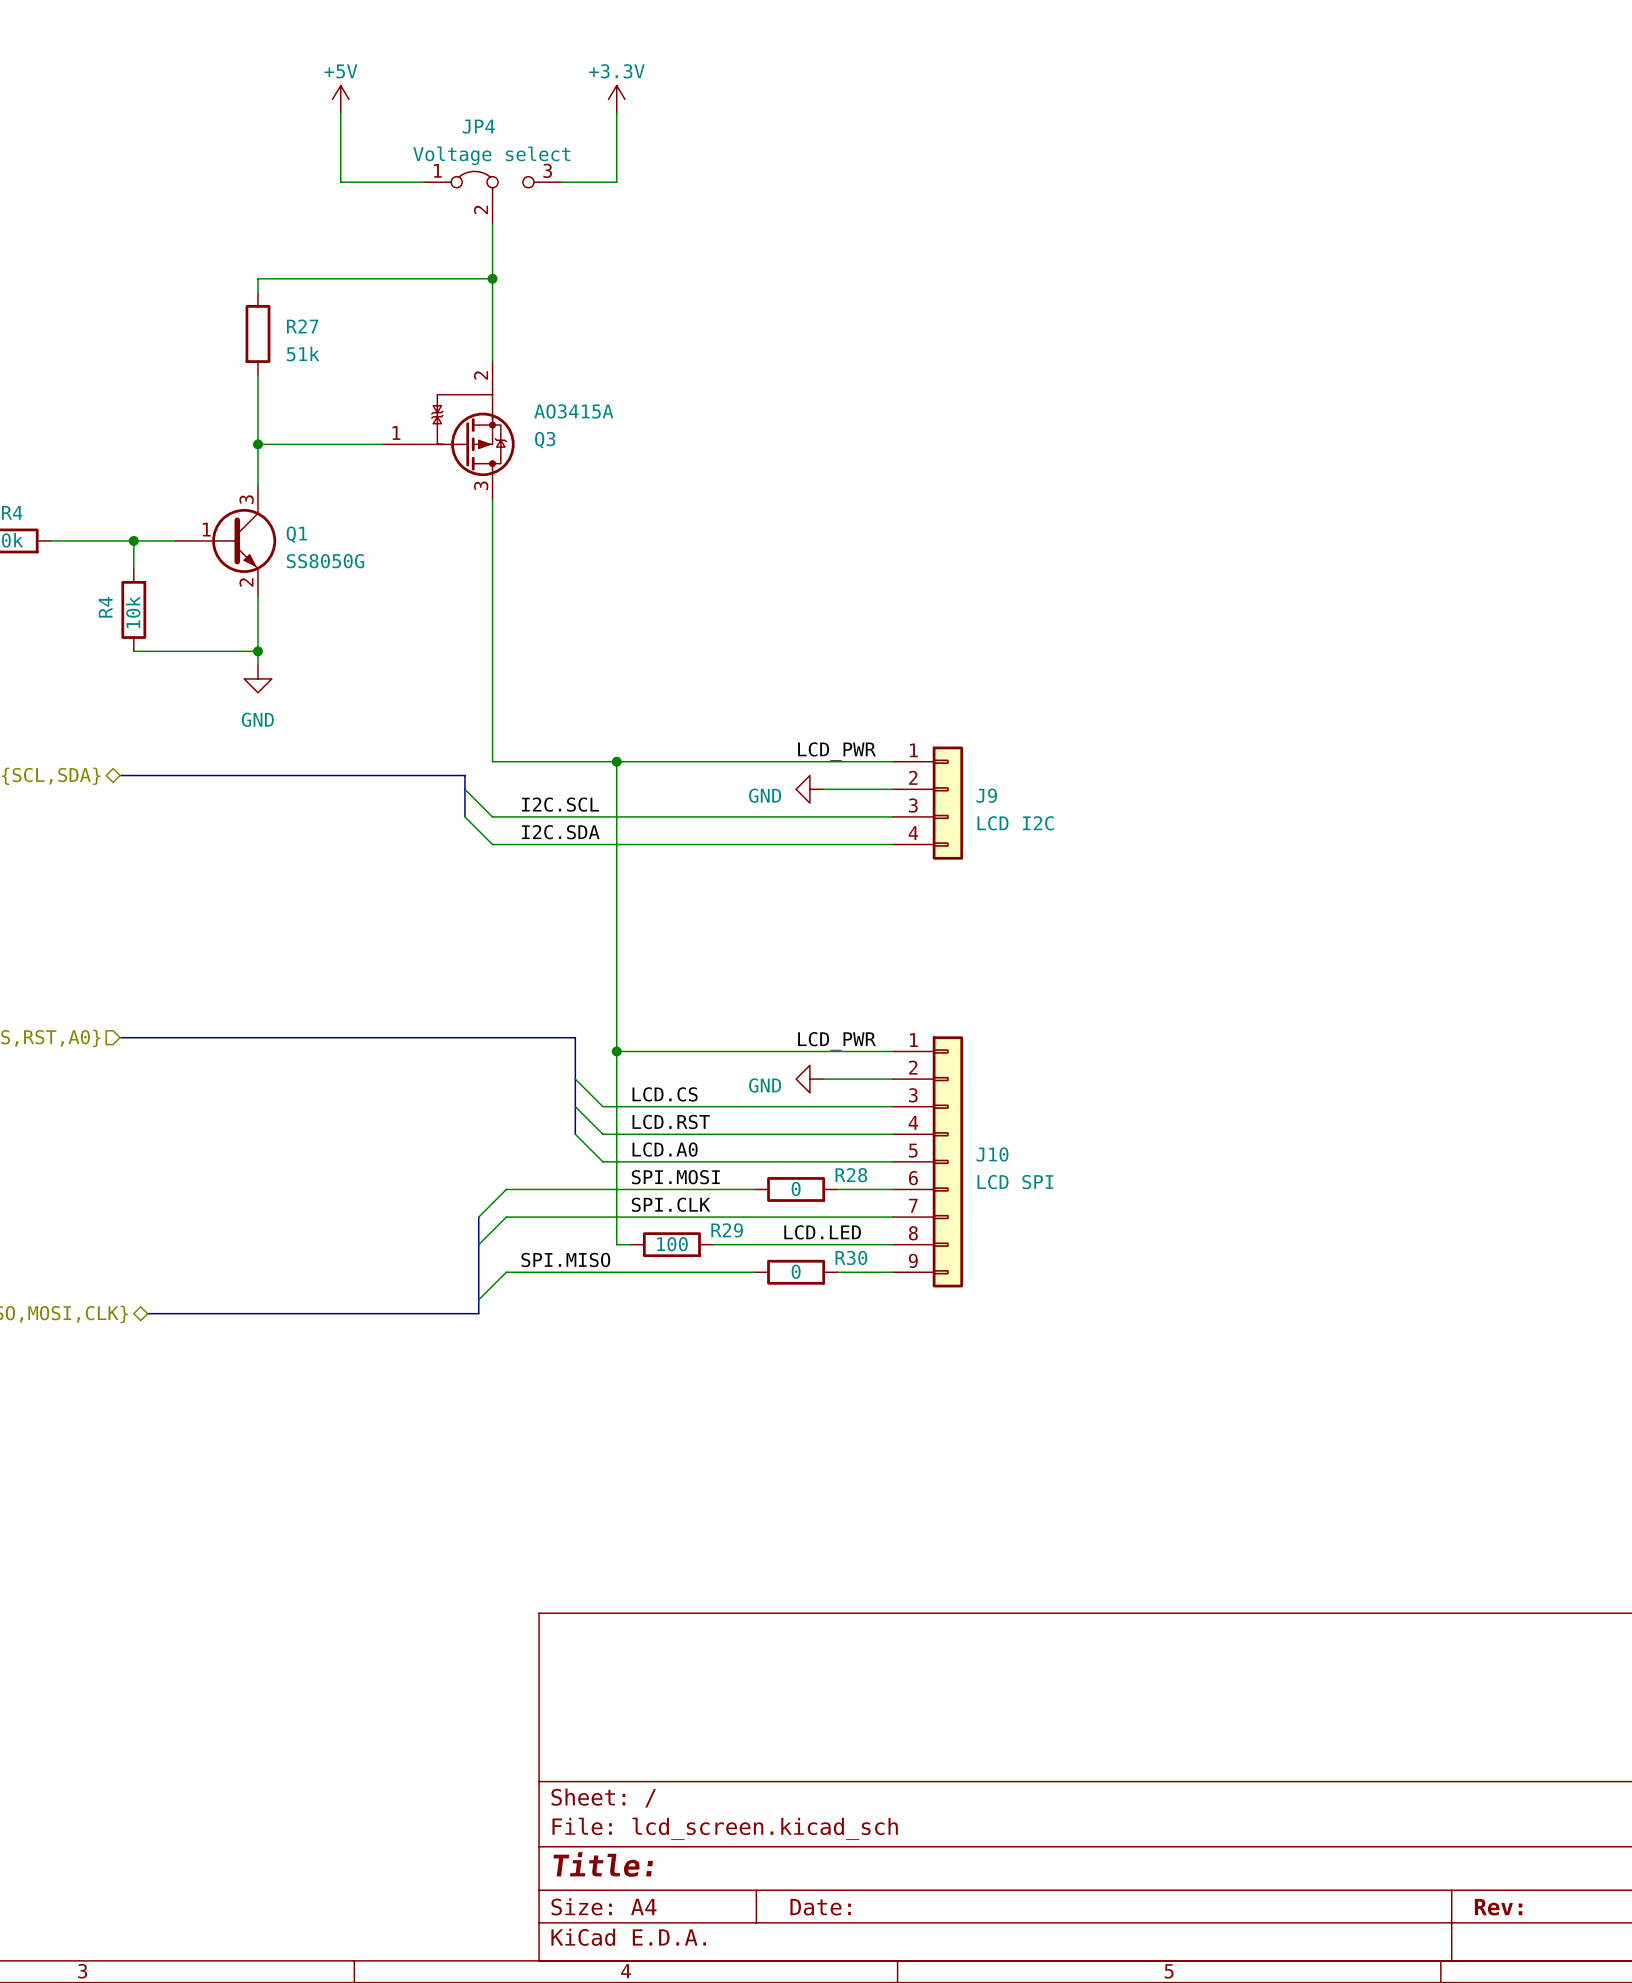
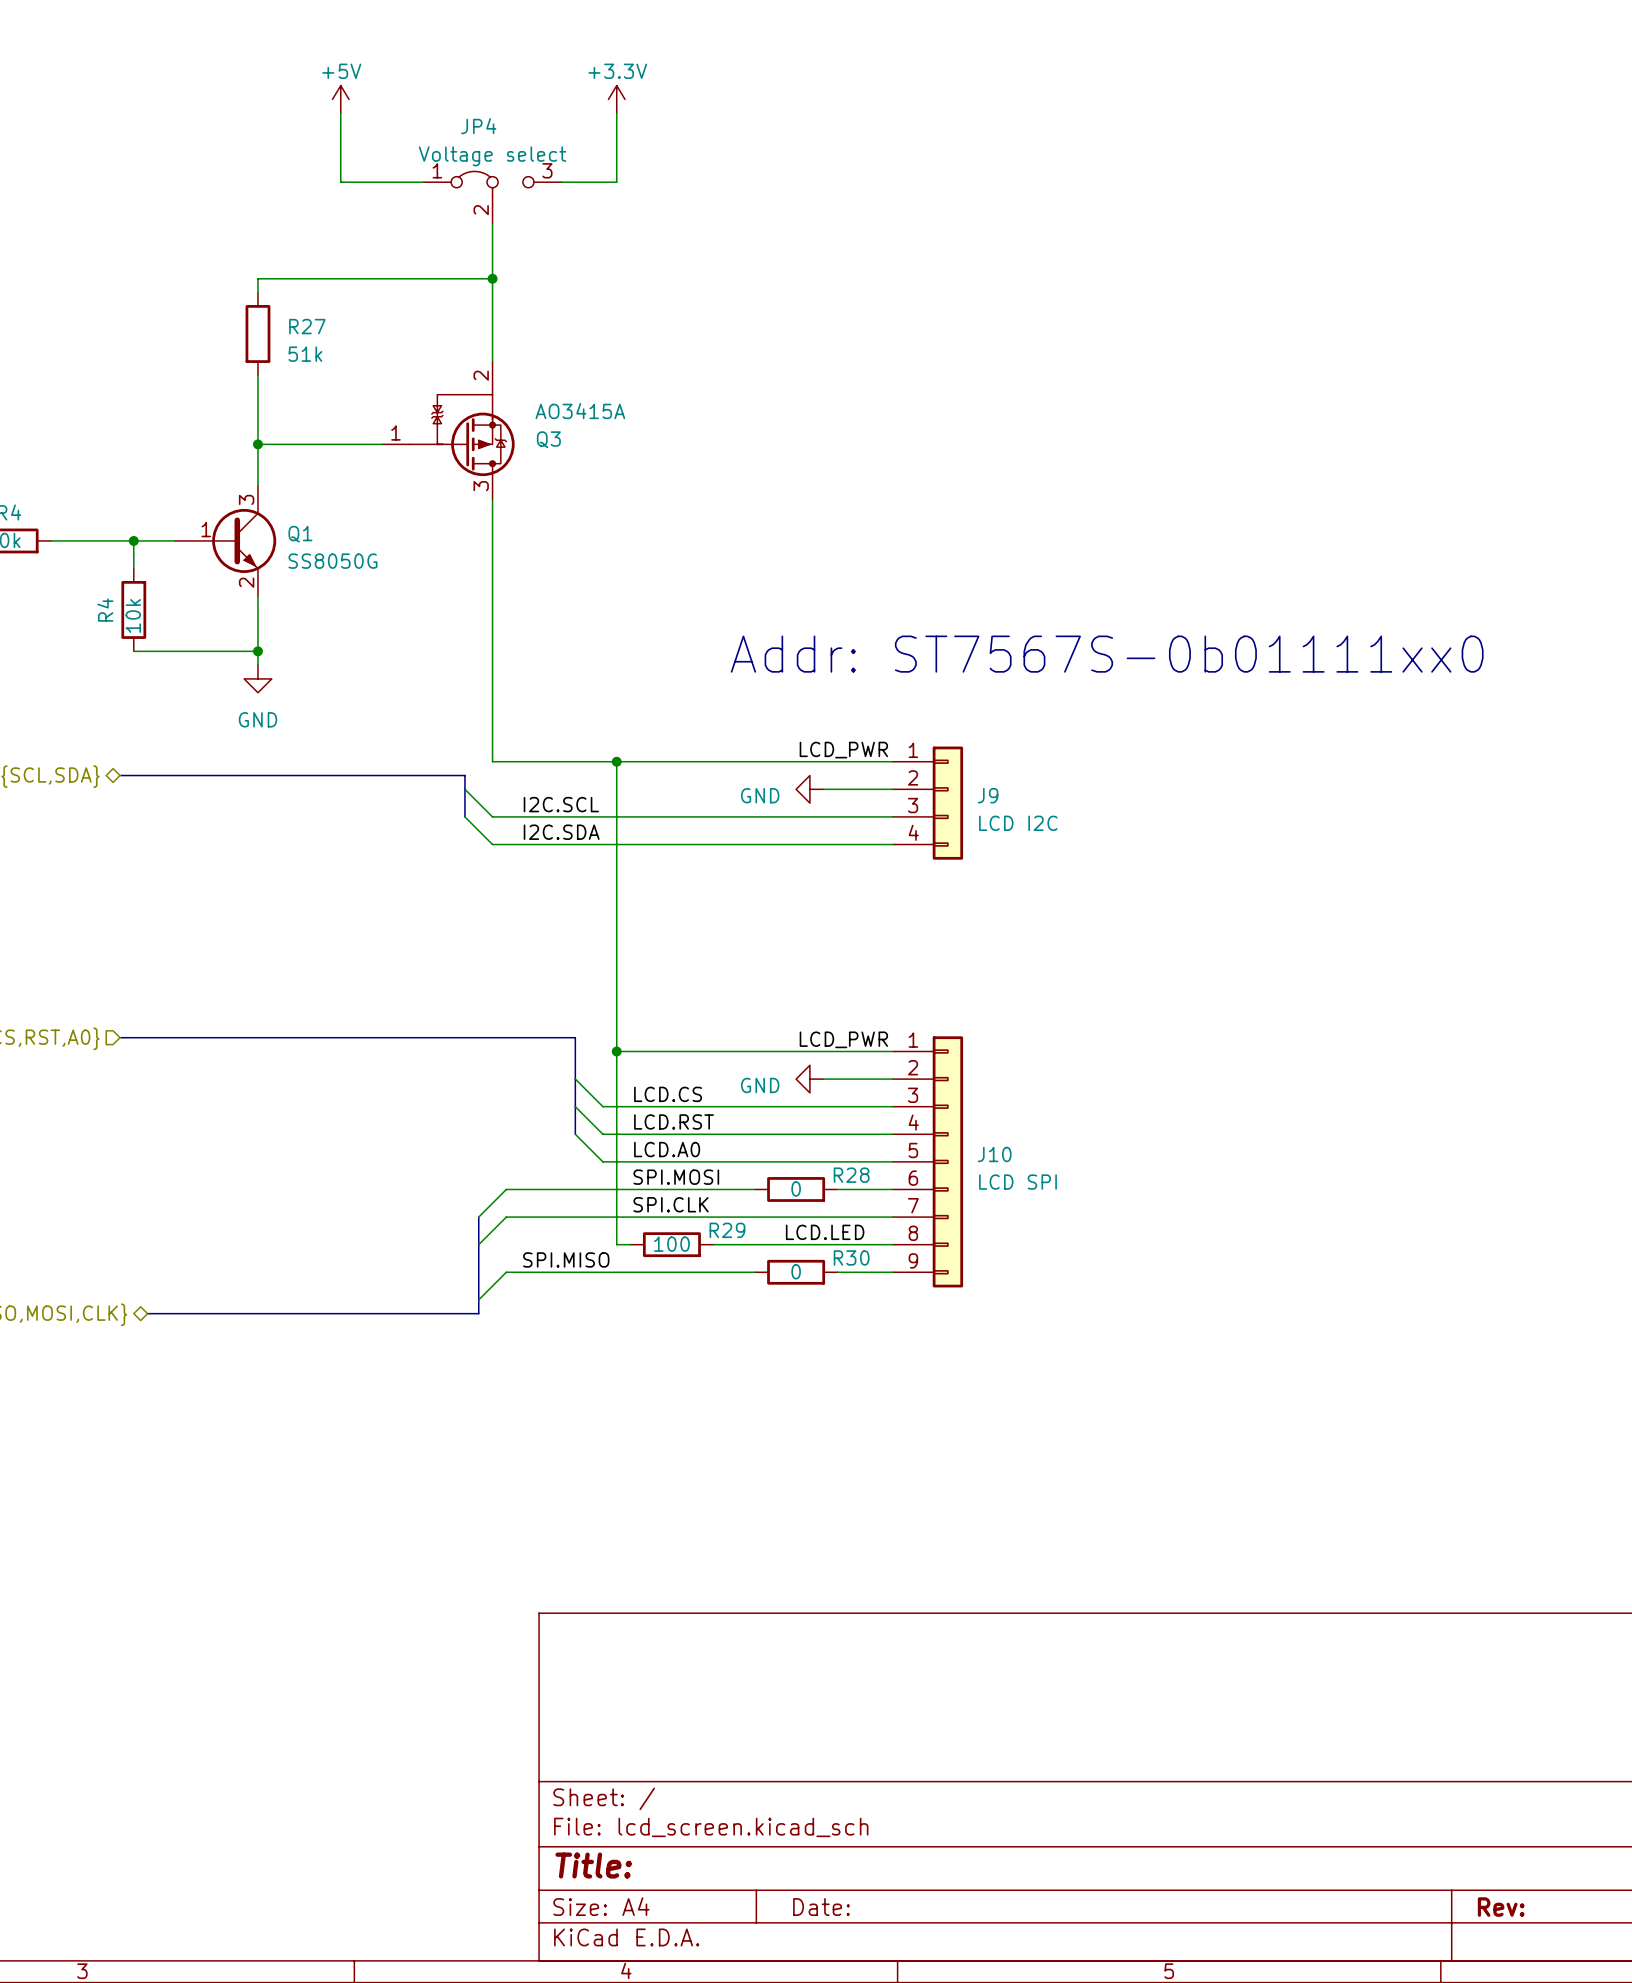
text: none -> Addr: ST7567S-0b01111xx0 (1107, 654)

